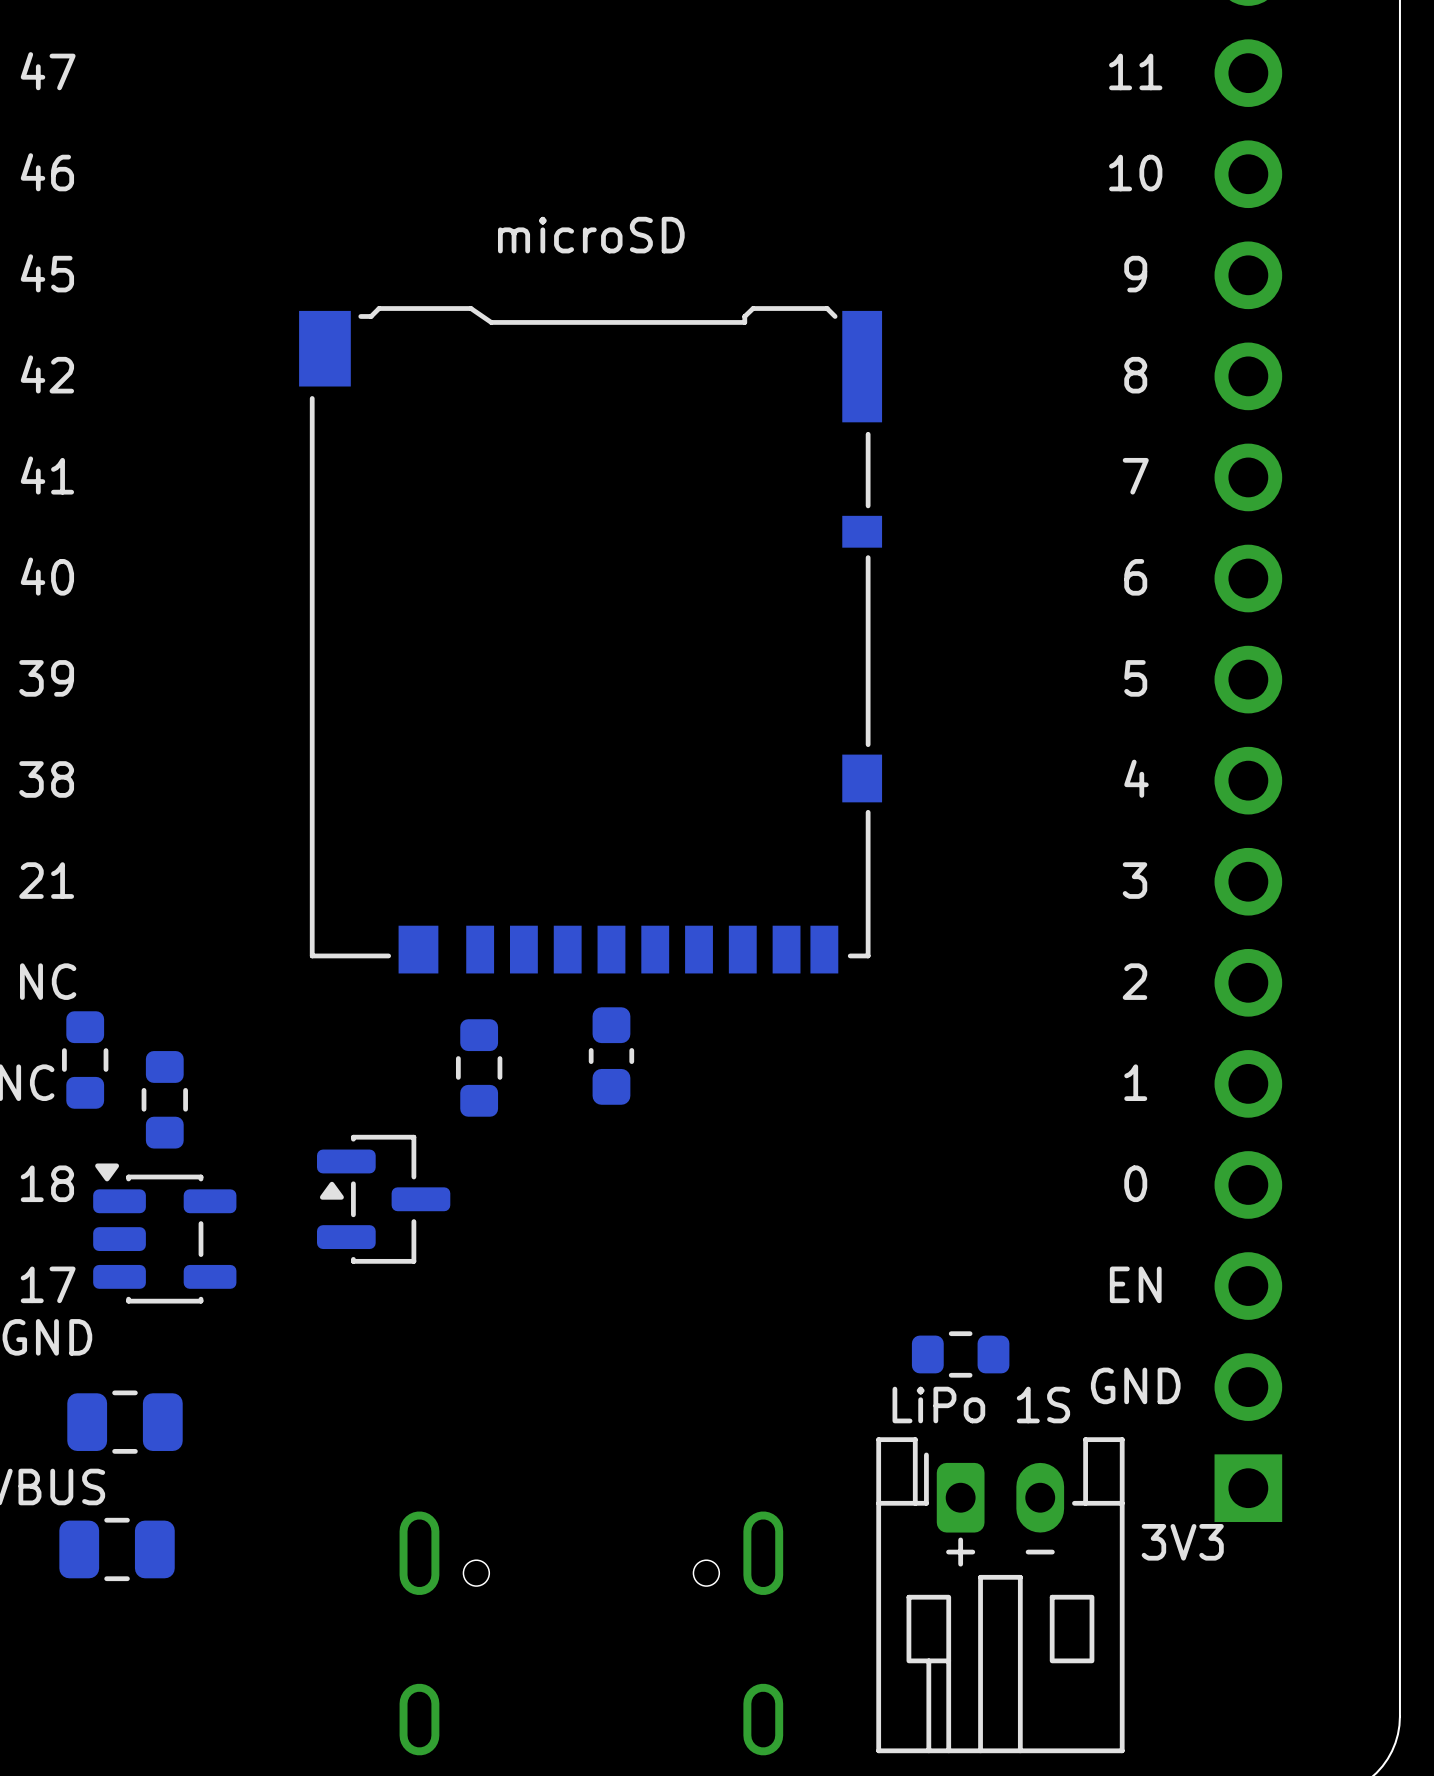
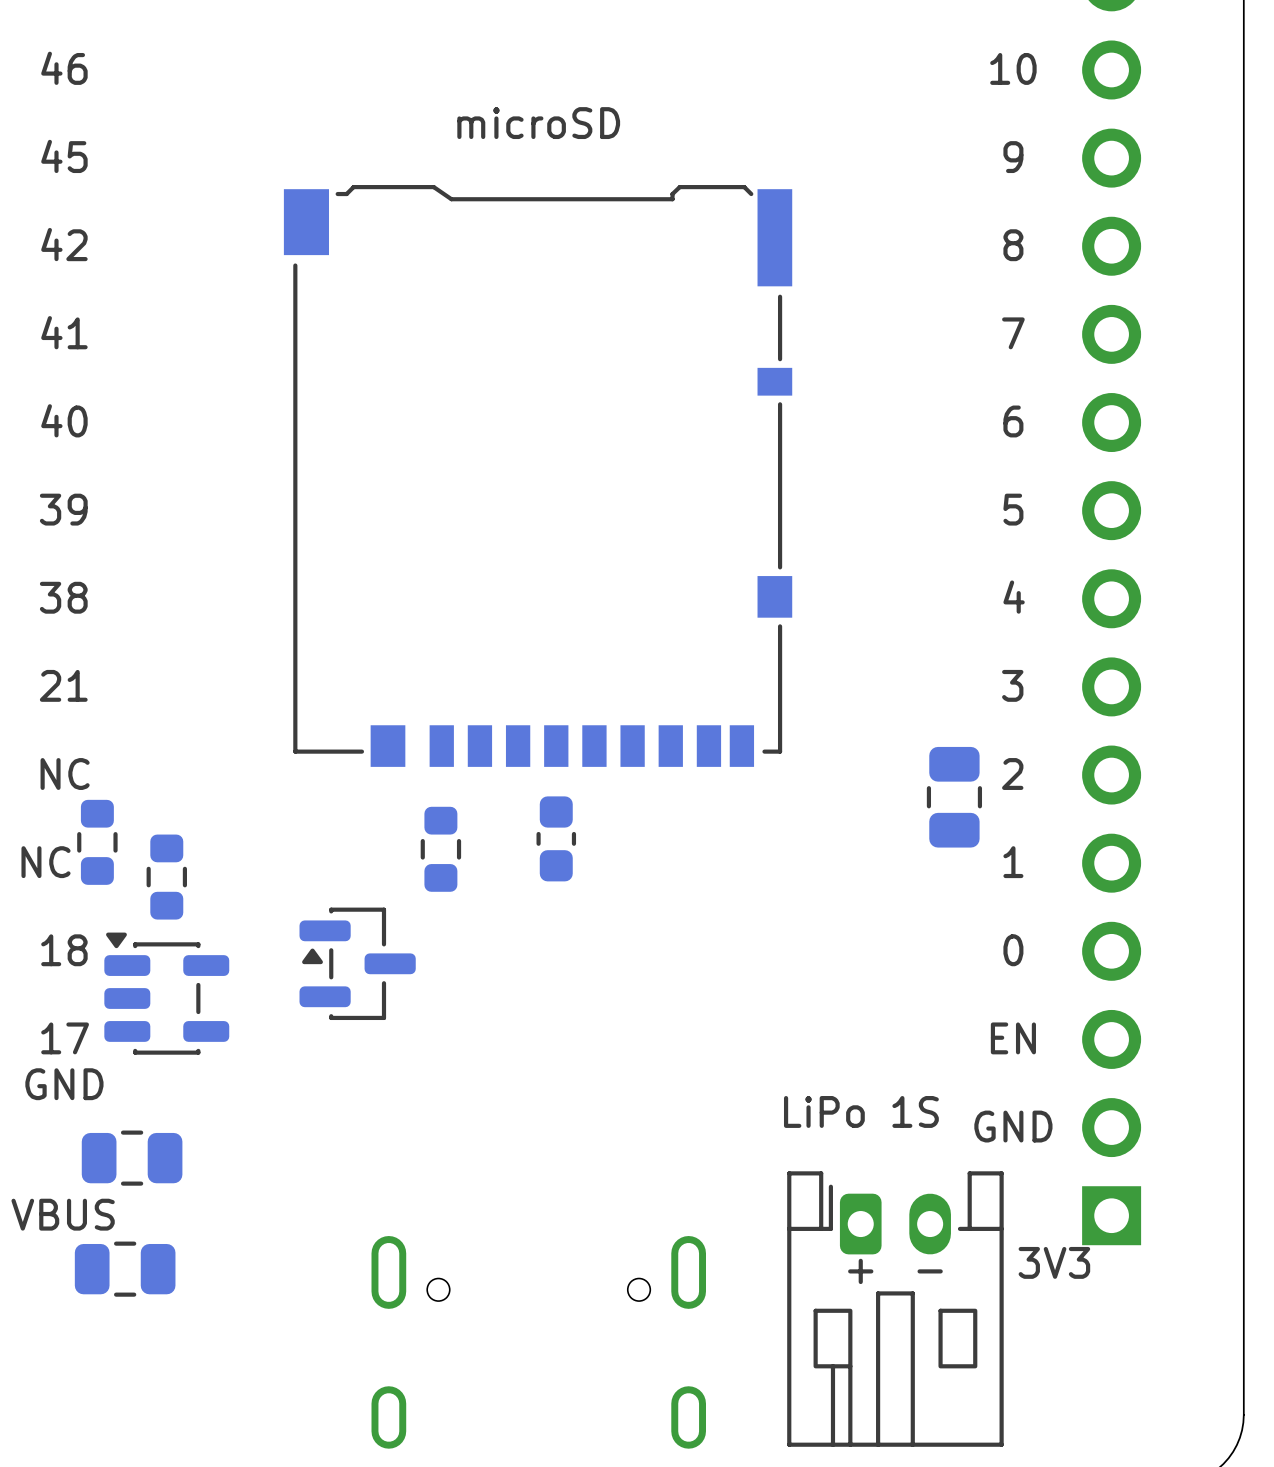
part: none -> (954, 797)
part: (960, 1354) -> none
text position: LiPo 1S (981, 1405) -> LiPo 1S (861, 1111)

